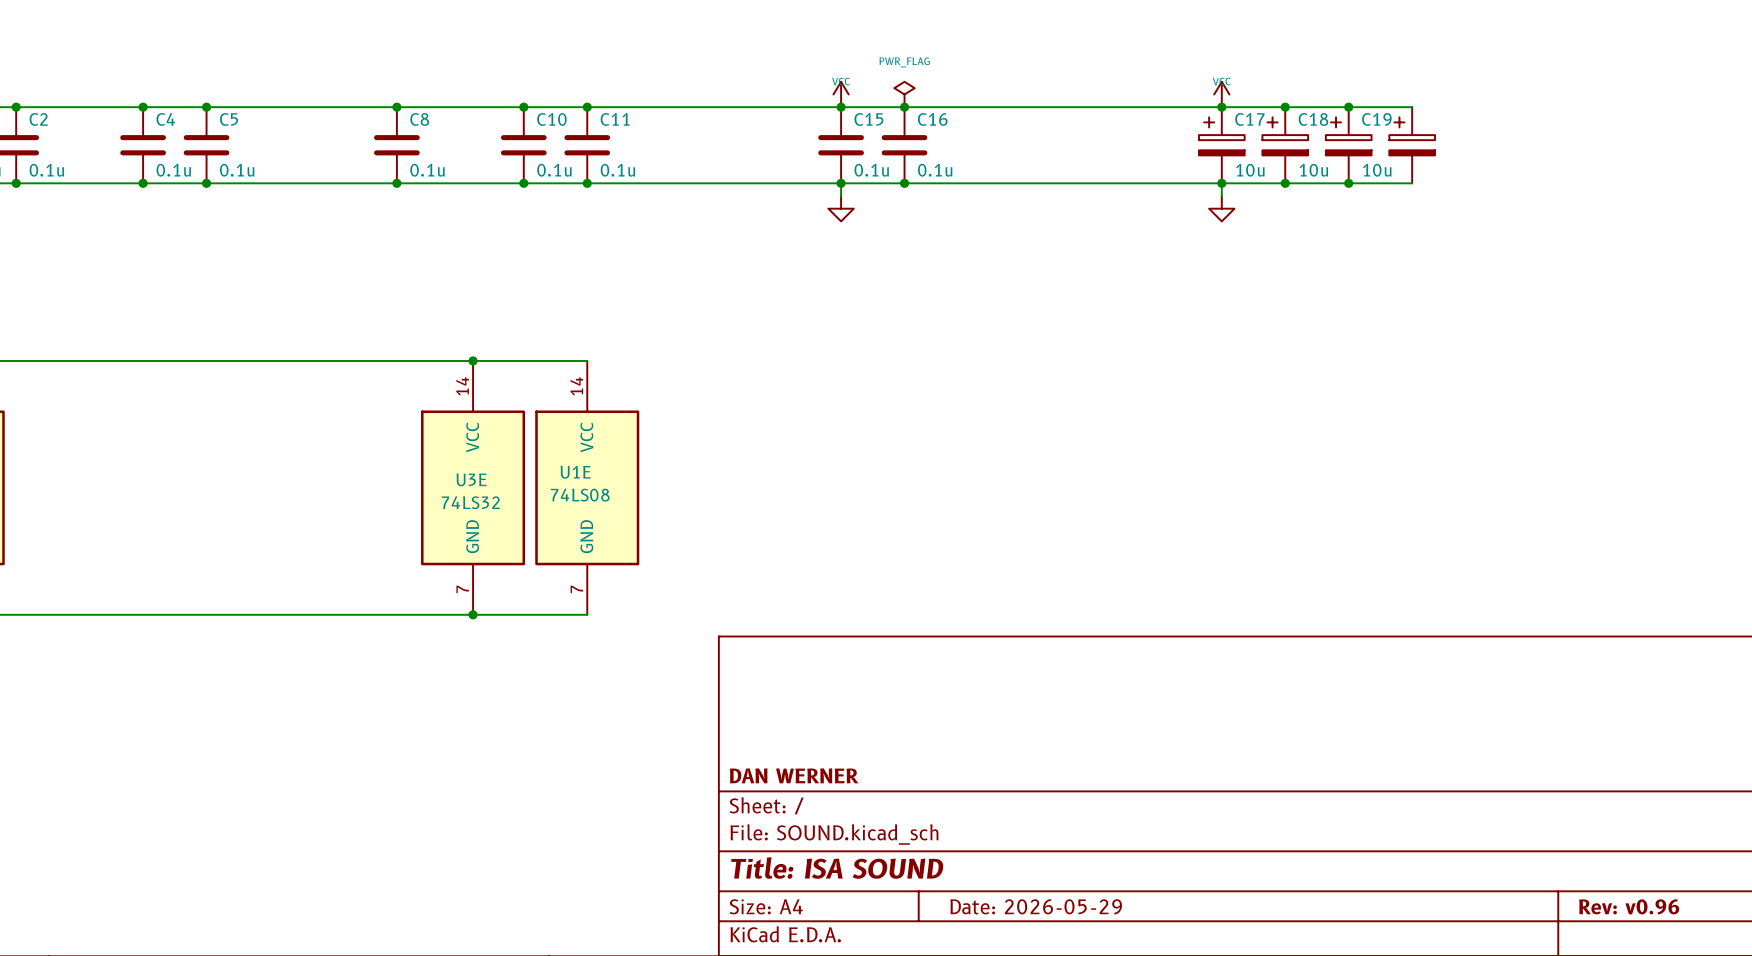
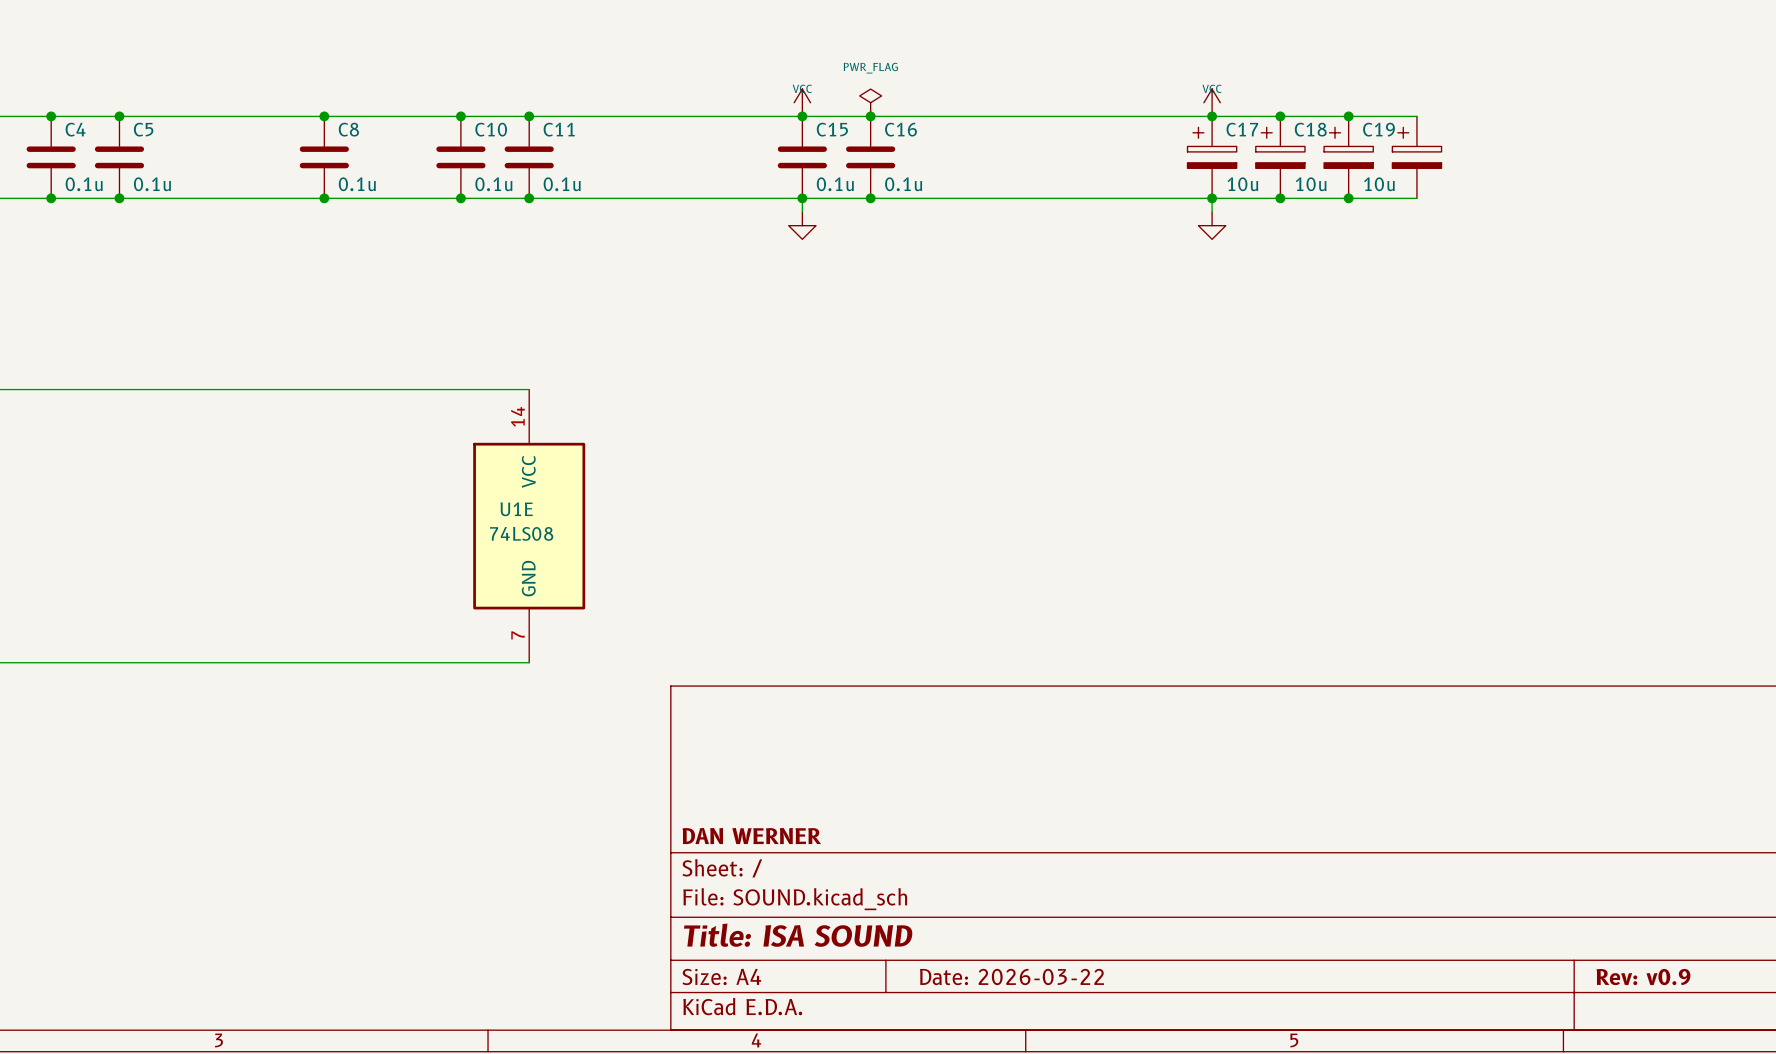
junction: (473, 360) -> none
U3E: 74LS32 (473, 487) -> none
junction: (473, 614) -> none
title block: Date: 2026-05-29 (1036, 906) -> Date: 2026-03-22 (1011, 976)
title block: Rev: v0.96 (1629, 906) -> Rev: v0.9 (1643, 977)

